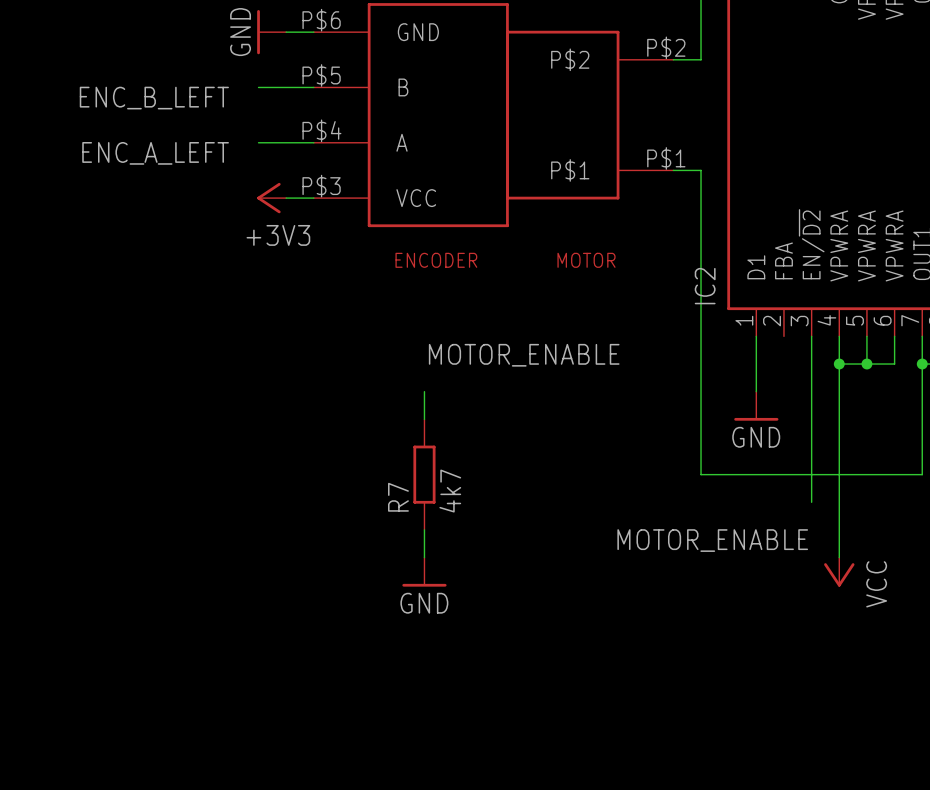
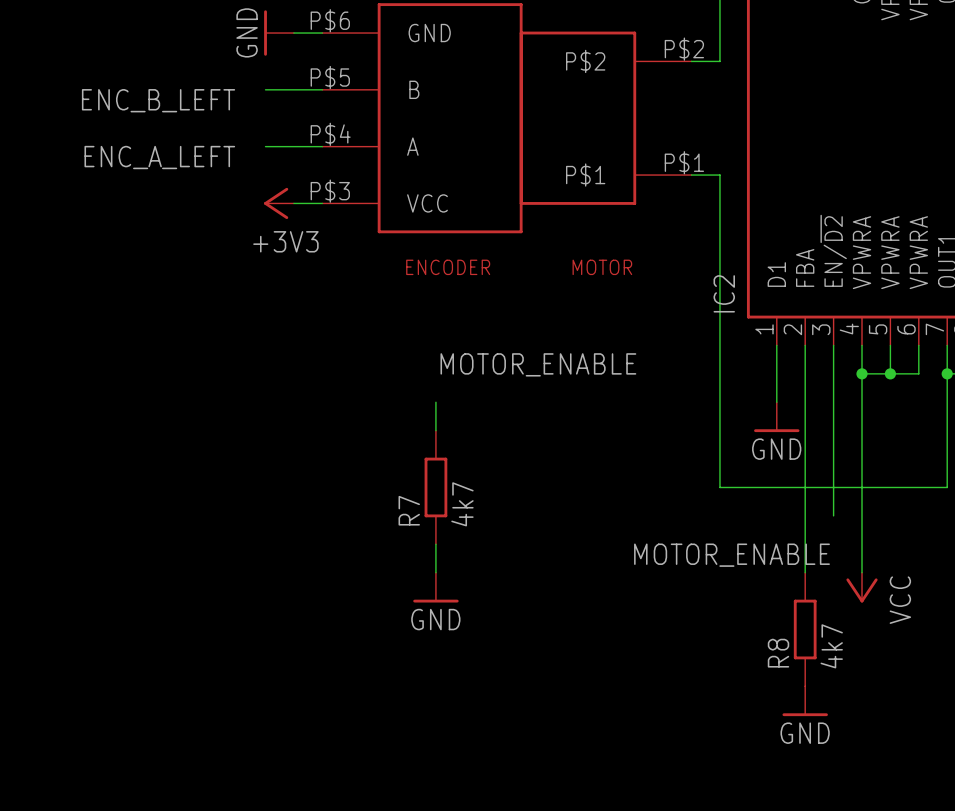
wire: none -> (805, 345) (805, 572)
R8: none -> 4k7 (805, 629)
power symbol: none -> GND (805, 701)

